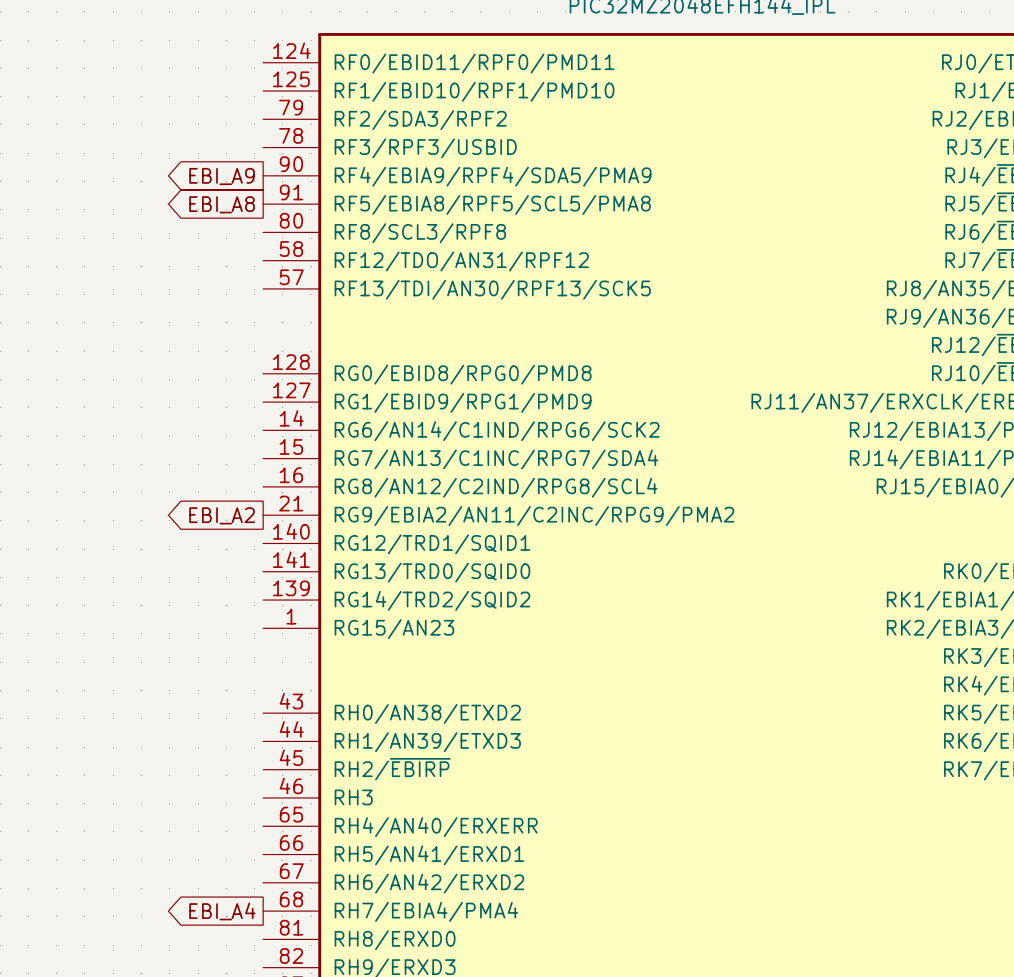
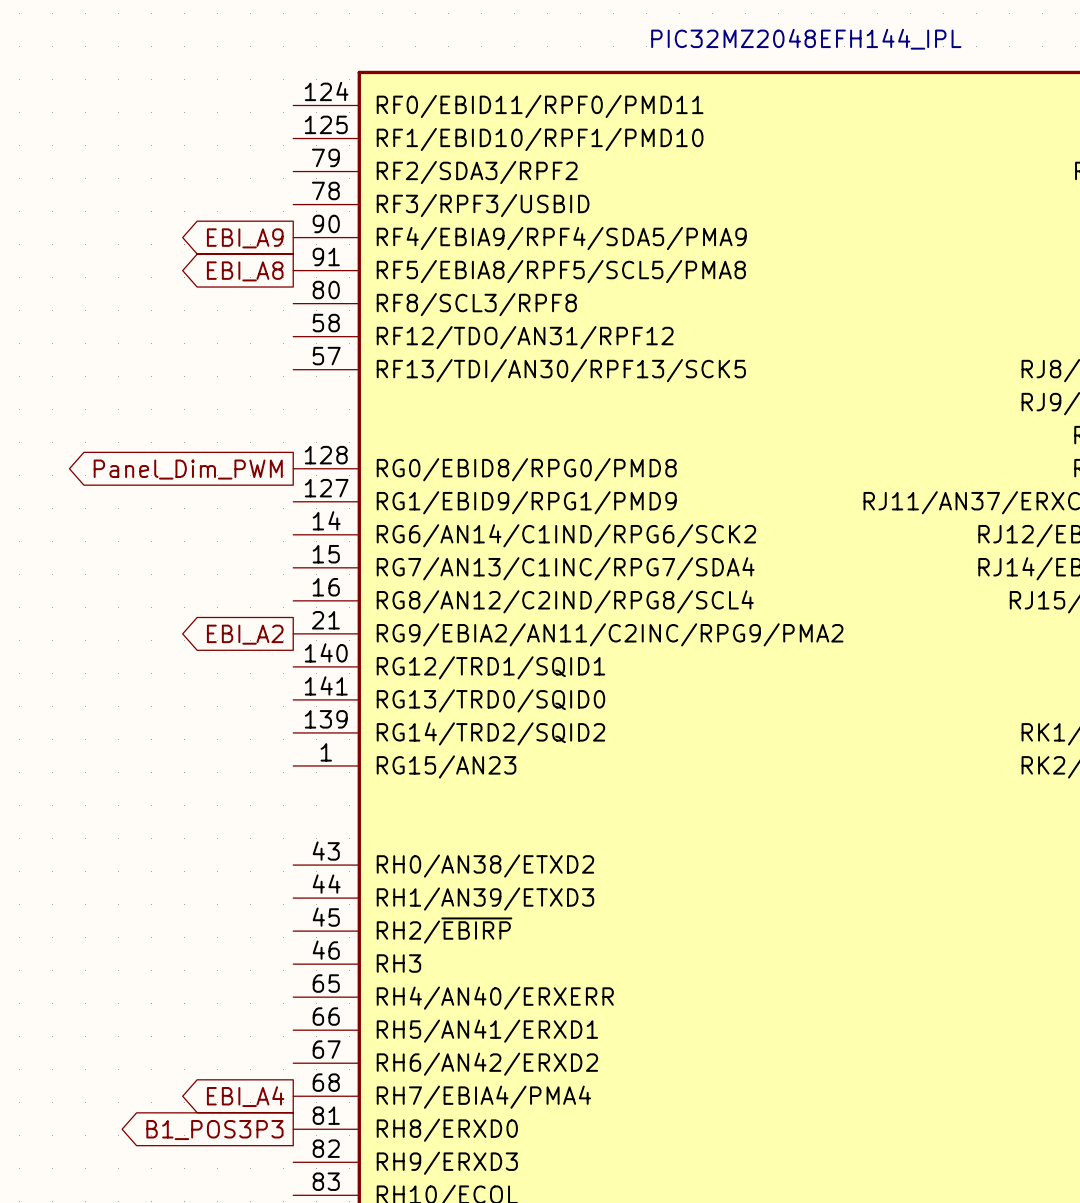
global label: none -> Panel_Dim_PWM (188, 469)
global label: none -> B1_POS3P3 (214, 1130)

